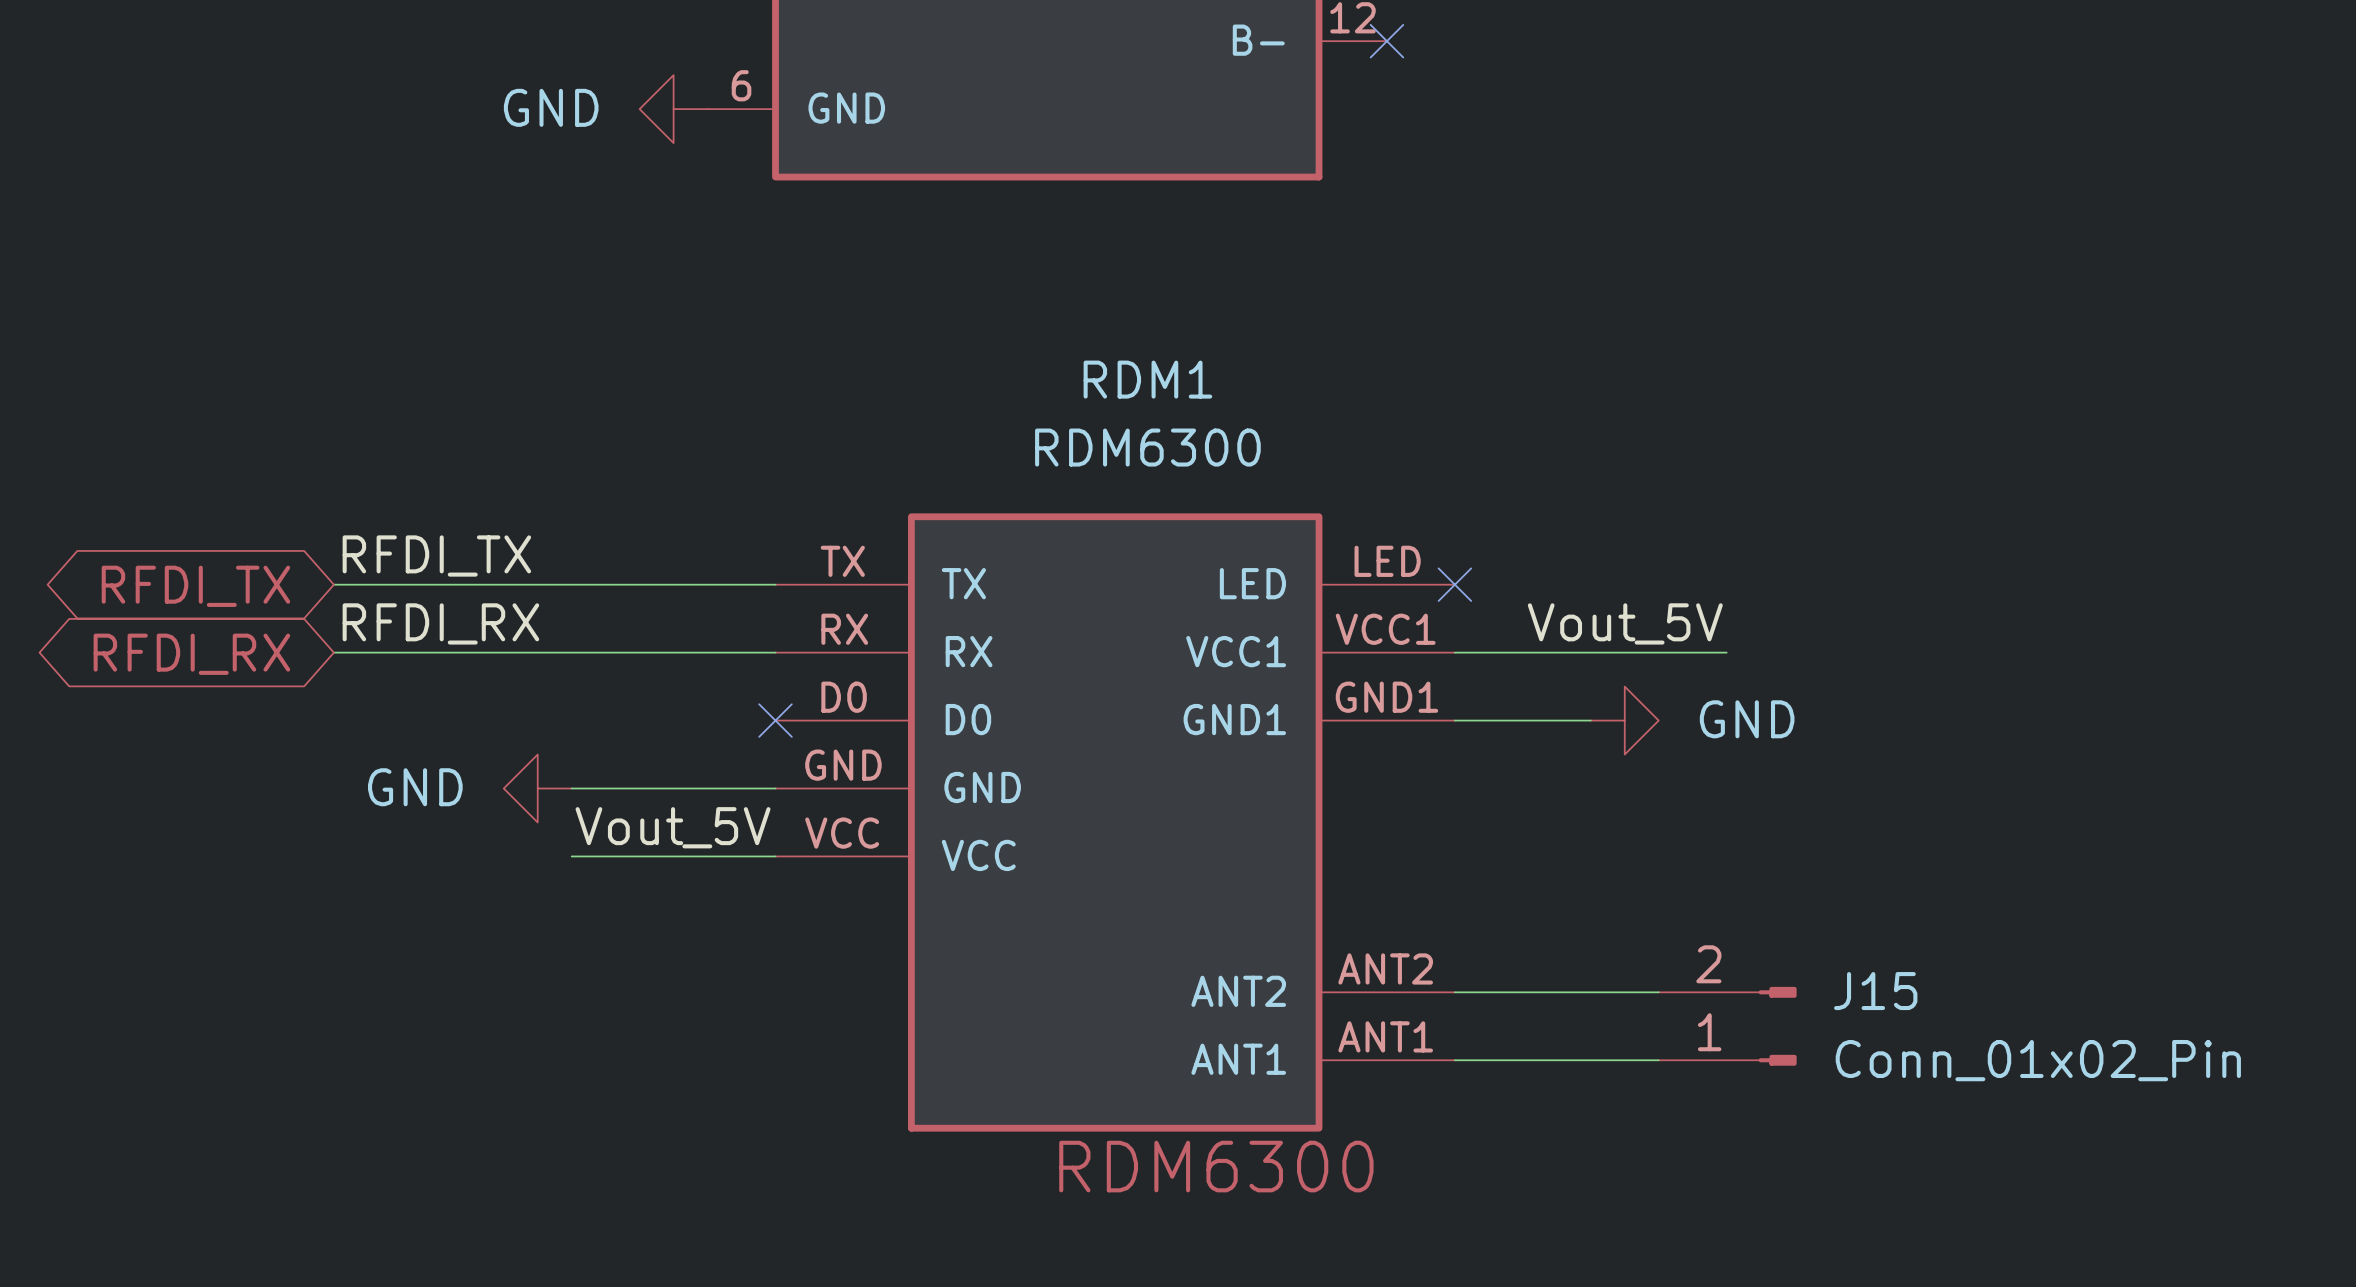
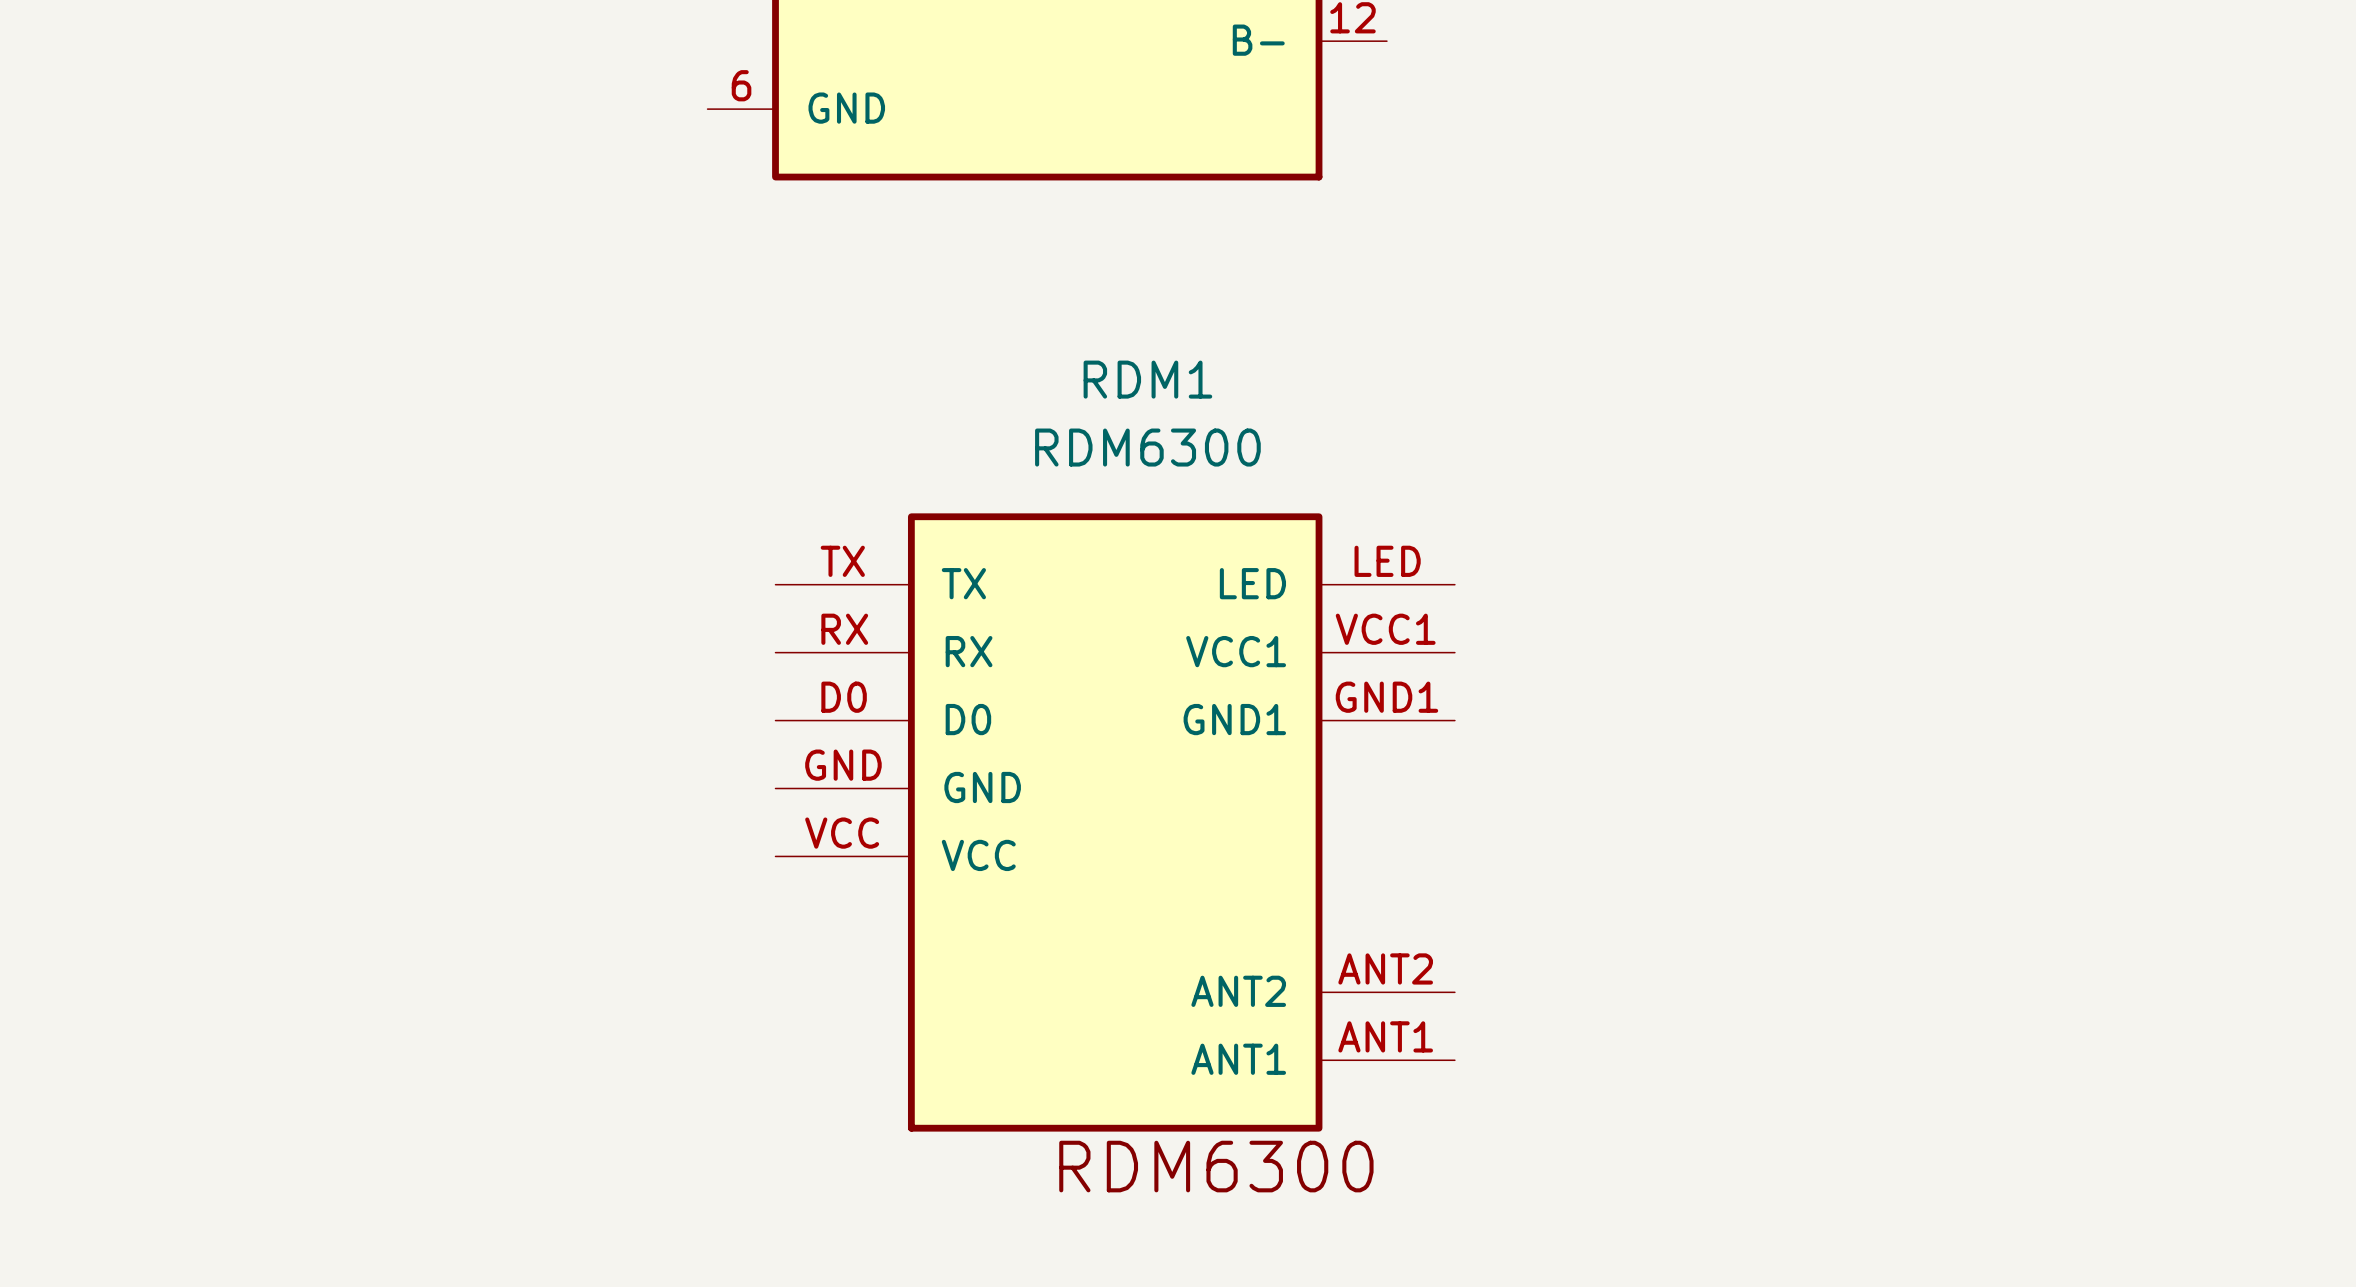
no-connect mark: (1386, 41) -> none
power symbol: GND (673, 109) -> none
label: RFDI_TX (436, 555) -> none
wire: (333, 584) (775, 584) -> none
no-connect mark: (1454, 584) -> none
global label: RFDI_TX (195, 586) -> none
label: RFDI_RX (440, 623) -> none
label: Vout_5V (1625, 623) -> none
wire: (333, 652) (775, 652) -> none
wire: (1454, 652) (1726, 652) -> none
global label: RFDI_RX (191, 654) -> none
no-connect mark: (775, 720) -> none
wire: (1454, 720) (1590, 720) -> none
power symbol: GND (1624, 720) -> none
power symbol: GND (537, 788) -> none
wire: (571, 788) (775, 788) -> none
label: Vout_5V (673, 827) -> none
wire: (571, 856) (775, 856) -> none
wire: (1454, 992) (1658, 992) -> none
J15: Conn_01x02_Pin (1727, 1026) -> none
wire: (1454, 1060) (1658, 1060) -> none

